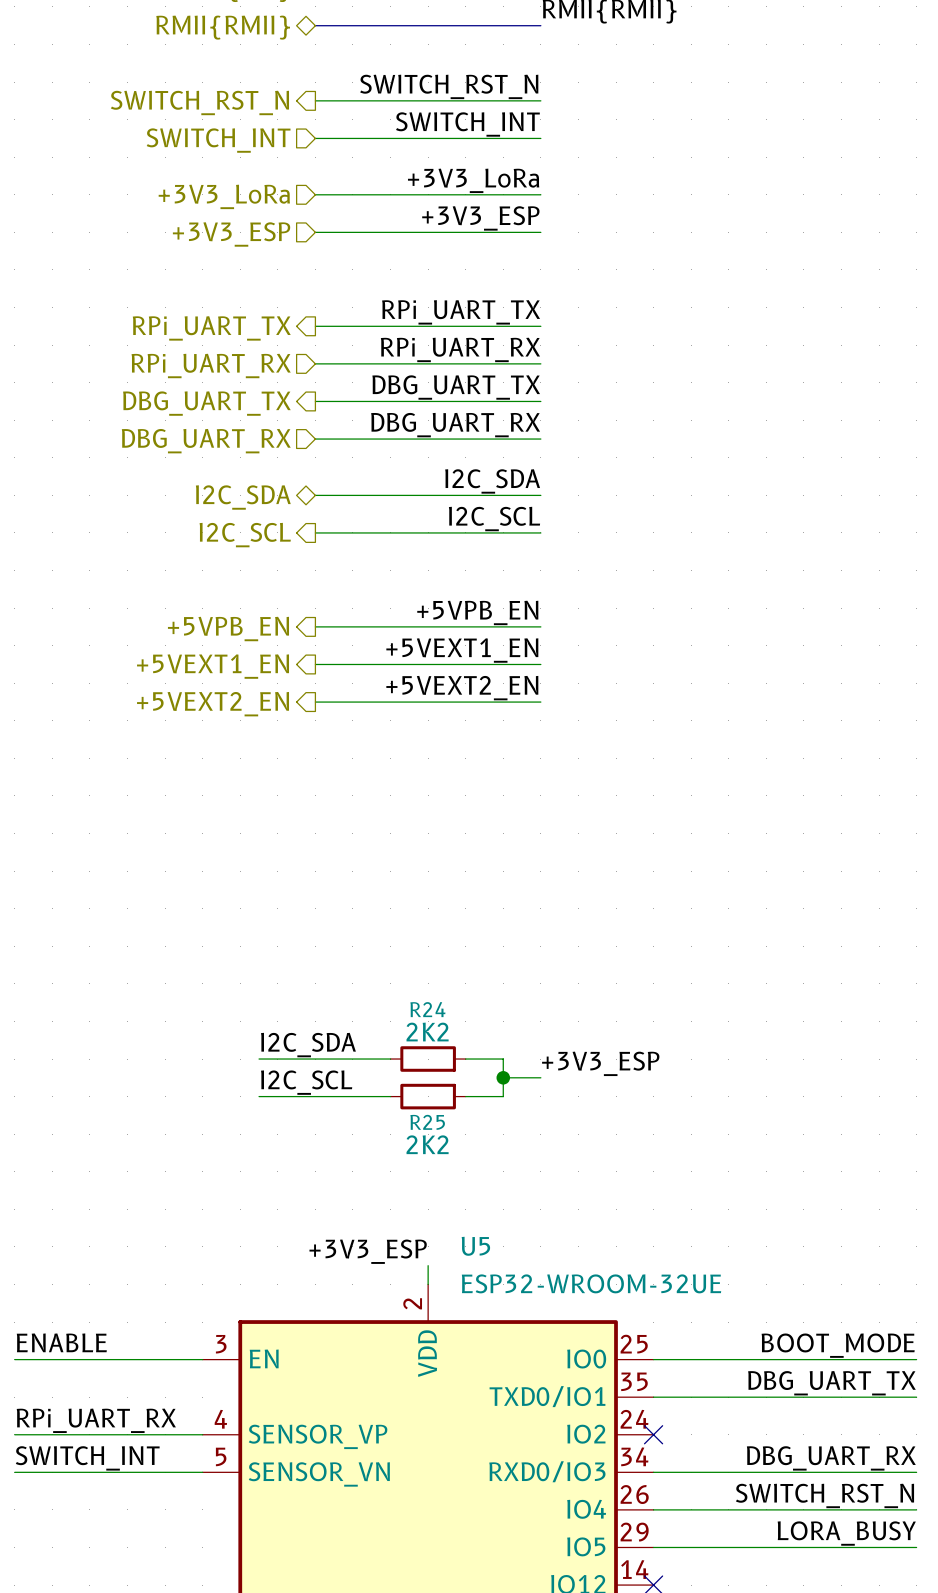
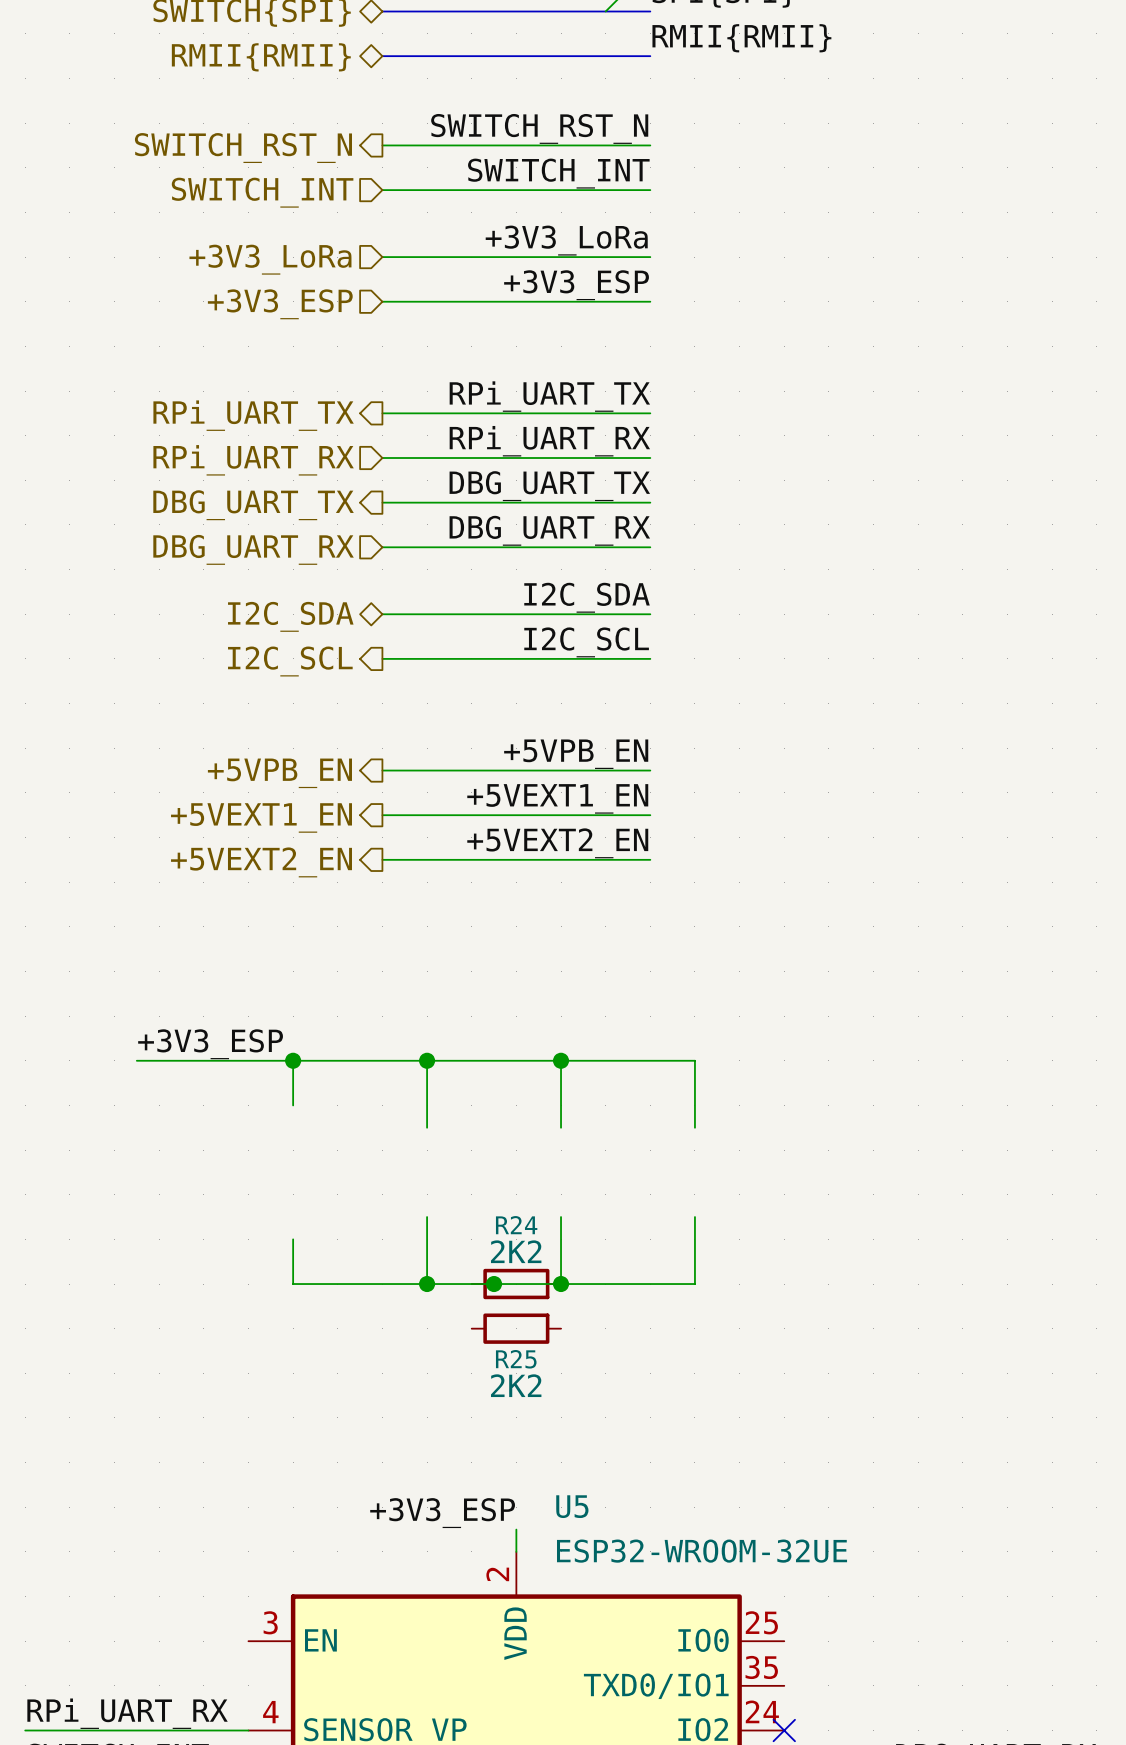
label: none -> +3V3_ESP (210, 1044)
wire: none -> (136, 1060) (694, 1060) (694, 1127)
wire: none -> (293, 1060) (293, 1105)
junction: none -> (293, 1060)
wire: none -> (427, 1060) (427, 1127)
junction: none -> (427, 1060)
wire: none -> (561, 1060) (561, 1127)
junction: none -> (561, 1060)
wire: none -> (427, 1217) (427, 1284)
wire: none -> (561, 1217) (561, 1284) (471, 1284)
wire: none -> (293, 1239) (293, 1284) (315, 1284)
label: I2C_SDA (308, 1045) -> none
junction: none -> (427, 1284)
junction: none -> (494, 1284)
wire: (503, 1059) (503, 1096) (465, 1096) -> (605, 1284) (694, 1284) (694, 1217)
label: +3V3_ESP (600, 1063) -> none
wire: (503, 1077) (540, 1077) -> none
junction position: (503, 1077) -> (561, 1284)
label: I2C_SCL (306, 1082) -> none
wire: (259, 1096) (390, 1096) -> none
label: ENABLE (61, 1342) -> none
label: BOOT_MODE (838, 1345) -> none
wire: (14, 1359) (202, 1359) -> none
wire: (653, 1359) (916, 1359) -> none
label: DBG_UART_TX (831, 1383) -> none
wire: (653, 1397) (916, 1397) -> none

